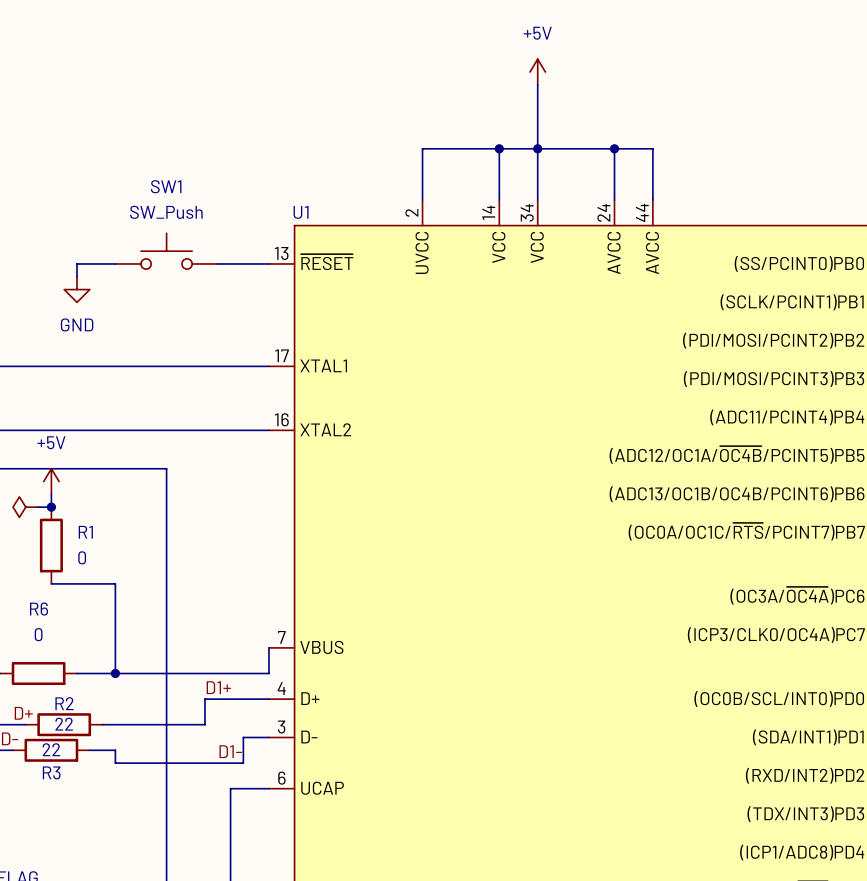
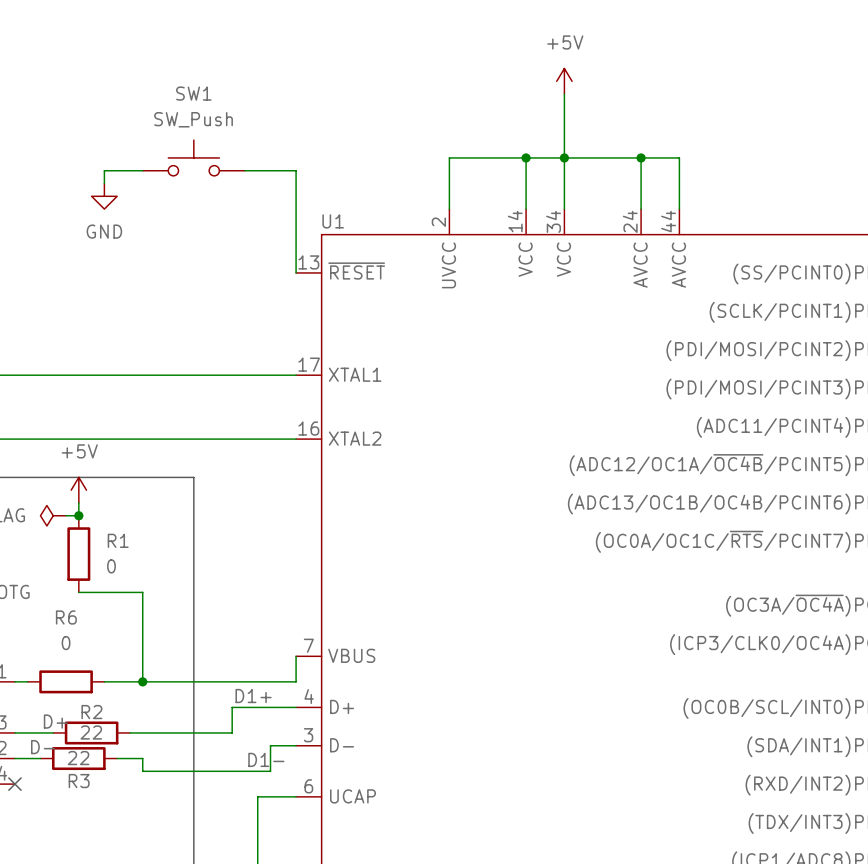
SW1 position: (166, 251) -> (193, 157)
wire: (115, 263) (77, 263) (77, 276) -> (142, 170) (104, 170) (104, 183)
wire: (217, 263) (268, 263) -> (244, 170) (296, 170) (296, 272)
power symbol position: GND (77, 289) -> GND (104, 196)

